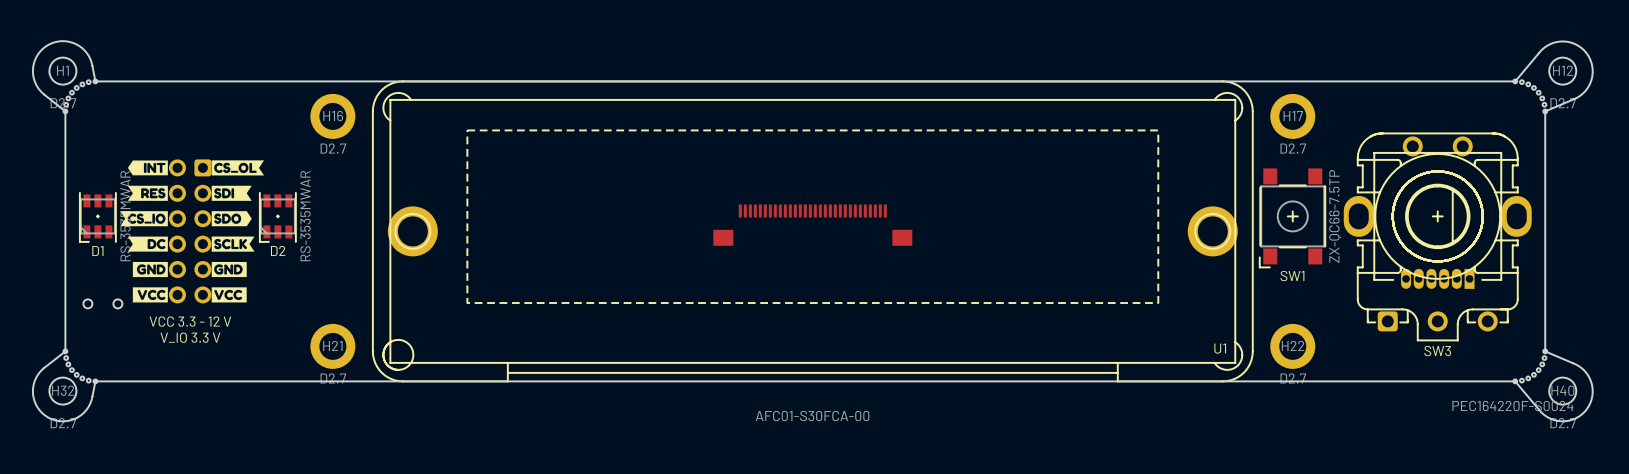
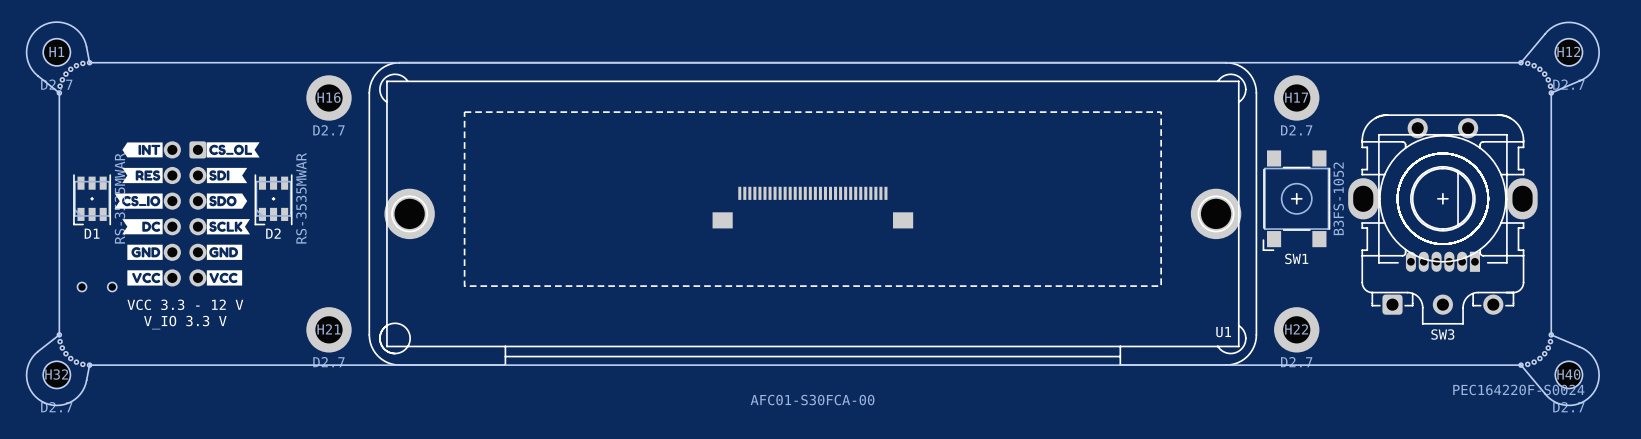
SW1 value: ZX-QC66-7.5TP (1335, 216) -> B3FS-1052 (1338, 198)

